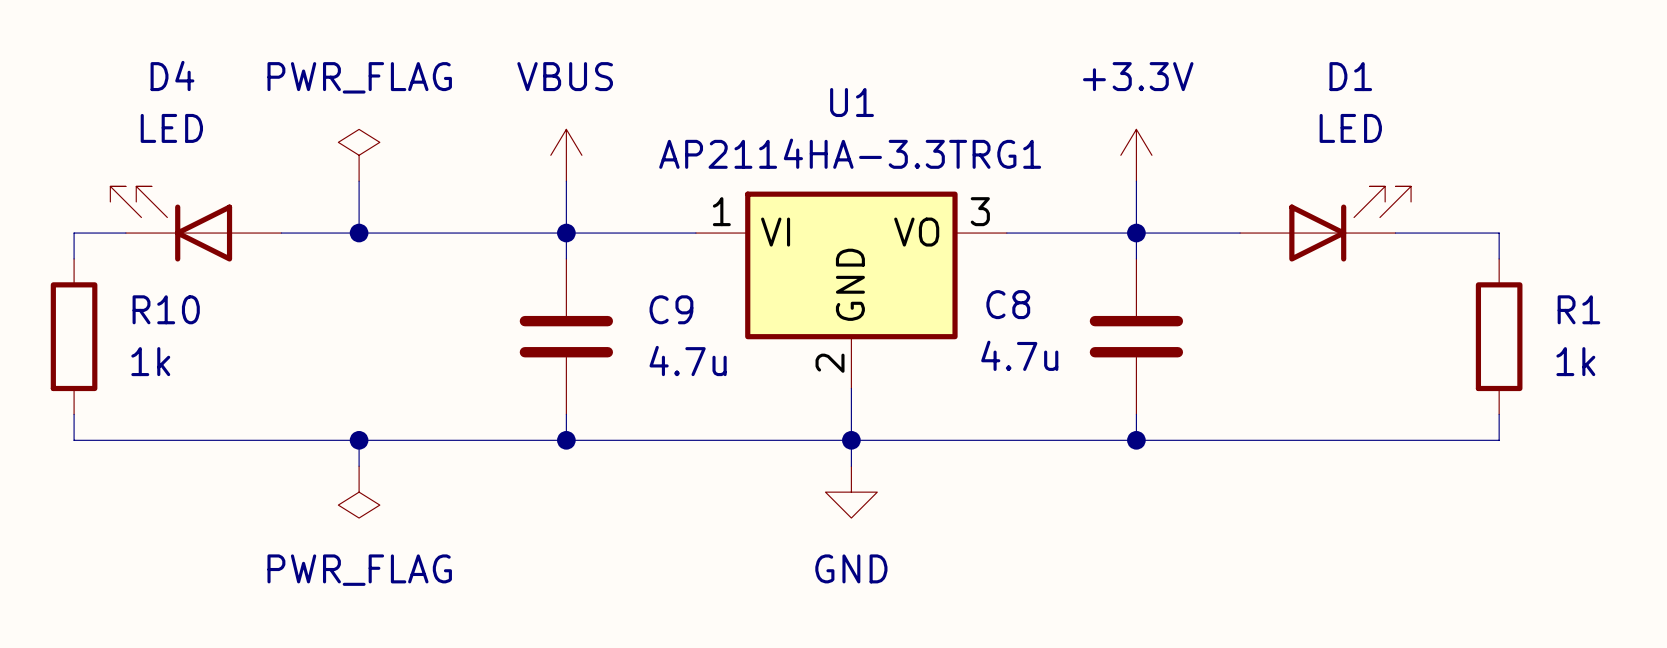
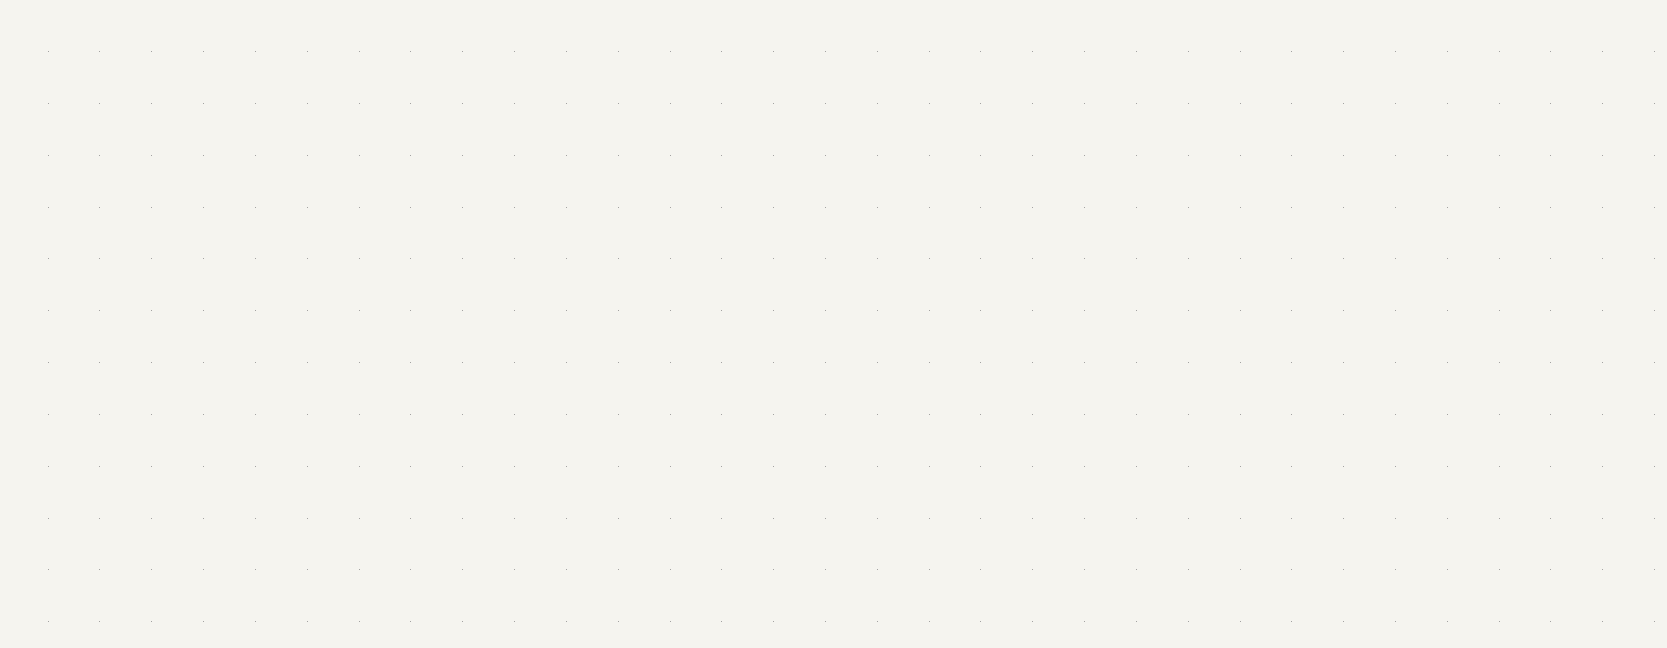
power symbol: PWR_FLAG (359, 155) -> none
power symbol: VBUS (566, 155) -> none
power symbol: +3.3V (1136, 155) -> none
wire: (359, 181) (359, 233) -> none
wire: (566, 181) (566, 258) -> none
wire: (1136, 181) (1136, 258) -> none
D4: LED (195, 223) -> none
D1: LED (1325, 223) -> none
wire: (125, 233) (74, 233) (74, 258) -> none
wire: (281, 233) (695, 233) -> none
junction: (359, 233) -> none
junction: (566, 233) -> none
wire: (1006, 233) (1240, 233) -> none
junction: (1136, 233) -> none
wire: (1395, 233) (1499, 233) (1499, 258) -> none
U1: AP2114HA-3.3TRG1 (851, 290) -> none
R10: 1k (74, 336) -> none
C9: 4.7u (566, 336) -> none
C8: 4.7u (1136, 336) -> none
R1: 1k (1499, 336) -> none
wire: (851, 388) (851, 466) -> none
wire: (74, 414) (74, 440) (1499, 440) (1499, 414) -> none
wire: (566, 414) (566, 440) -> none
wire: (1136, 414) (1136, 440) -> none
wire: (359, 440) (359, 466) -> none
junction: (359, 440) -> none
junction: (566, 440) -> none
junction: (851, 440) -> none
junction: (1136, 440) -> none
power symbol: PWR_FLAG (359, 492) -> none
power symbol: GND (851, 492) -> none

